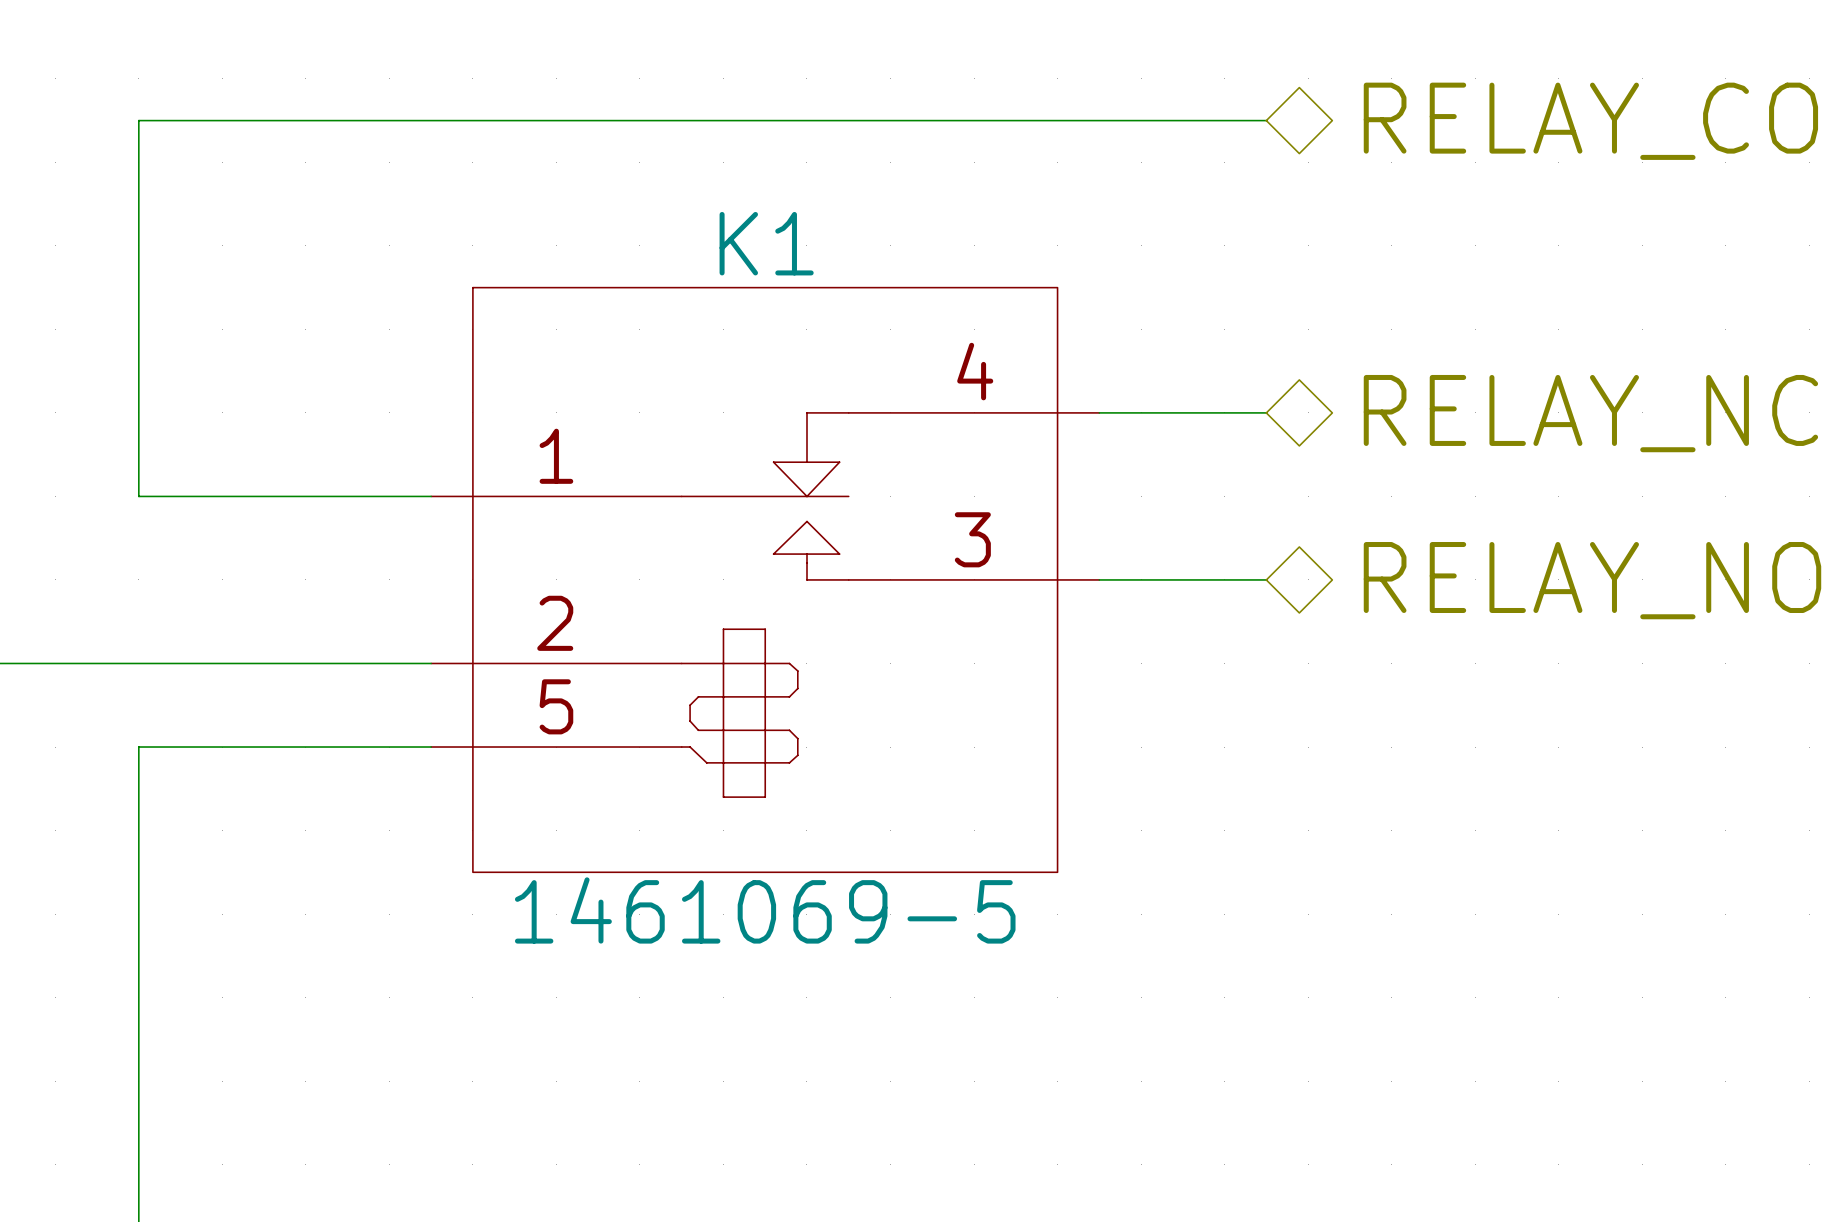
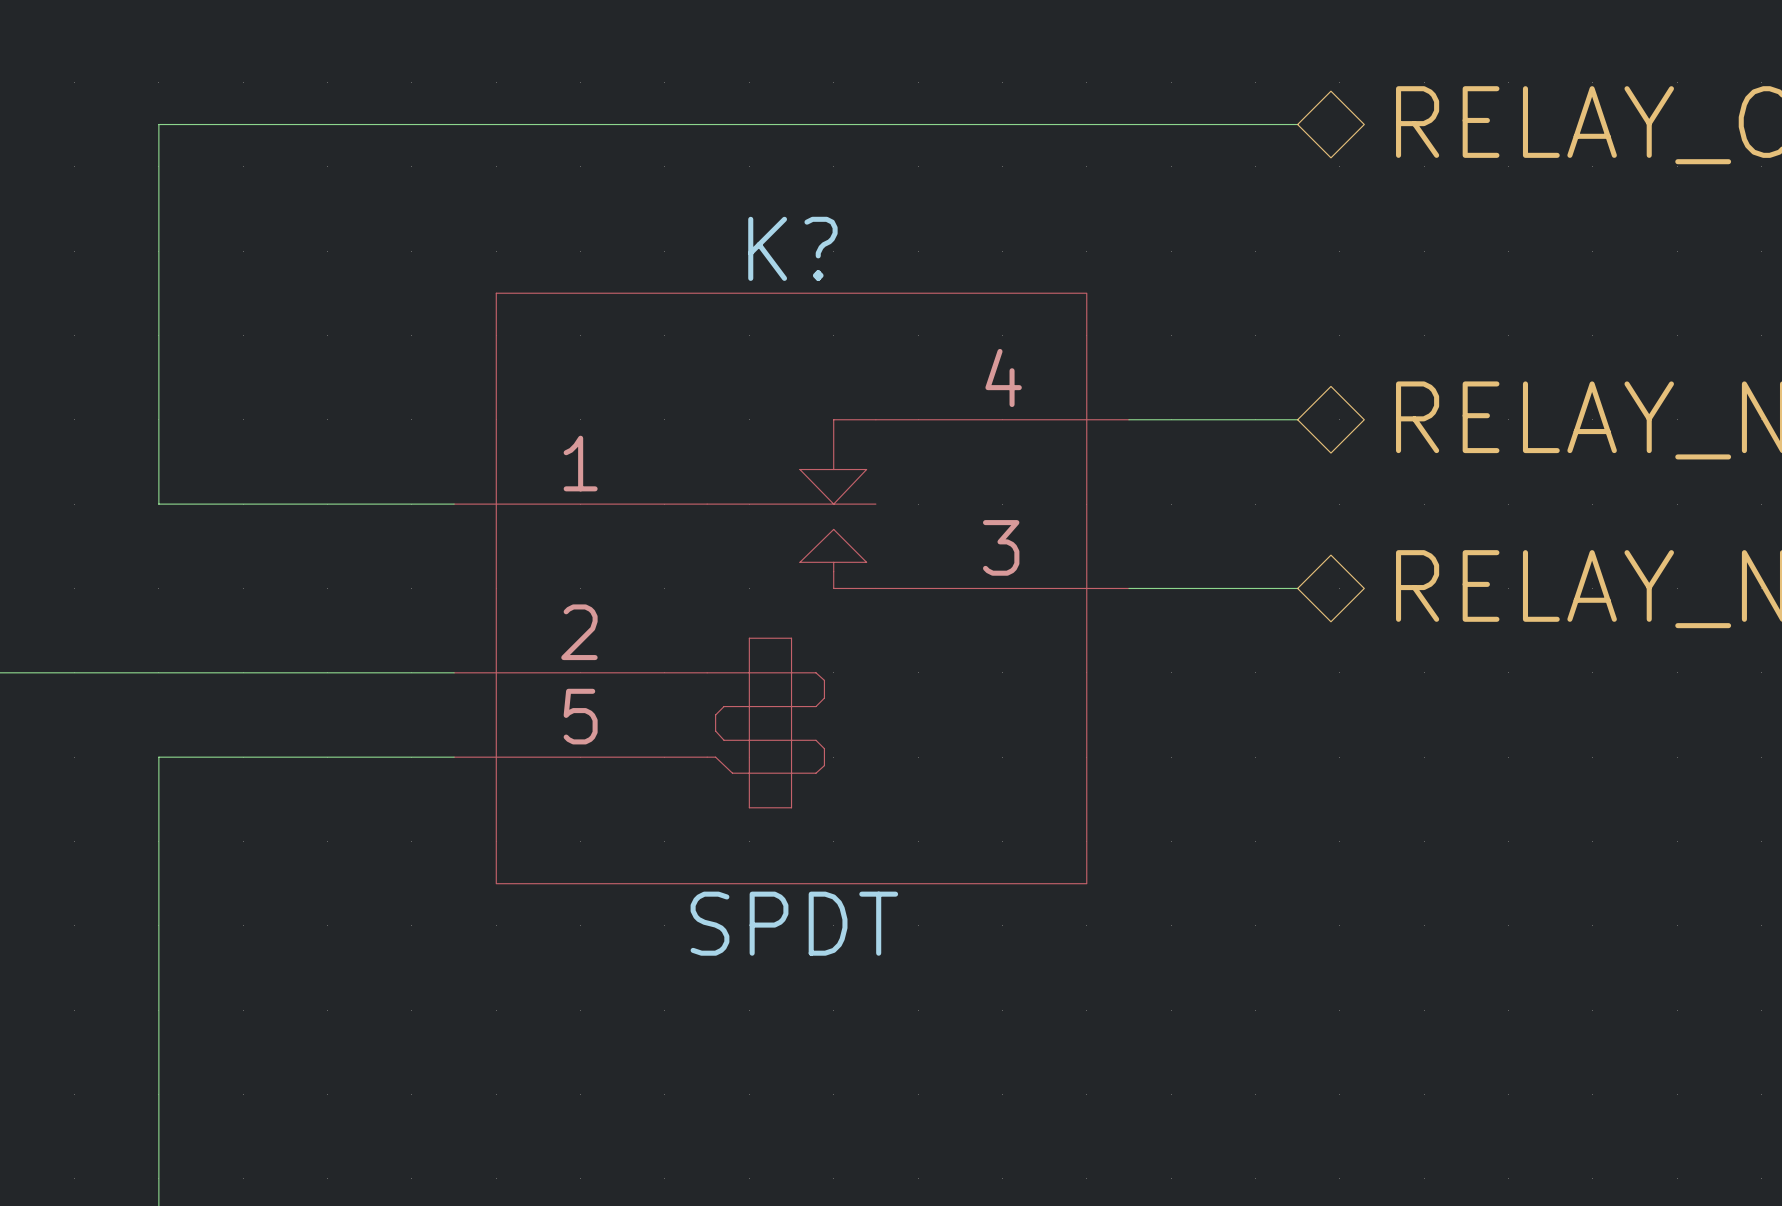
K1 name: K1 (766, 243) -> K? (792, 248)
K1 value: 1461069-5 (765, 910) -> SPDT (794, 923)

